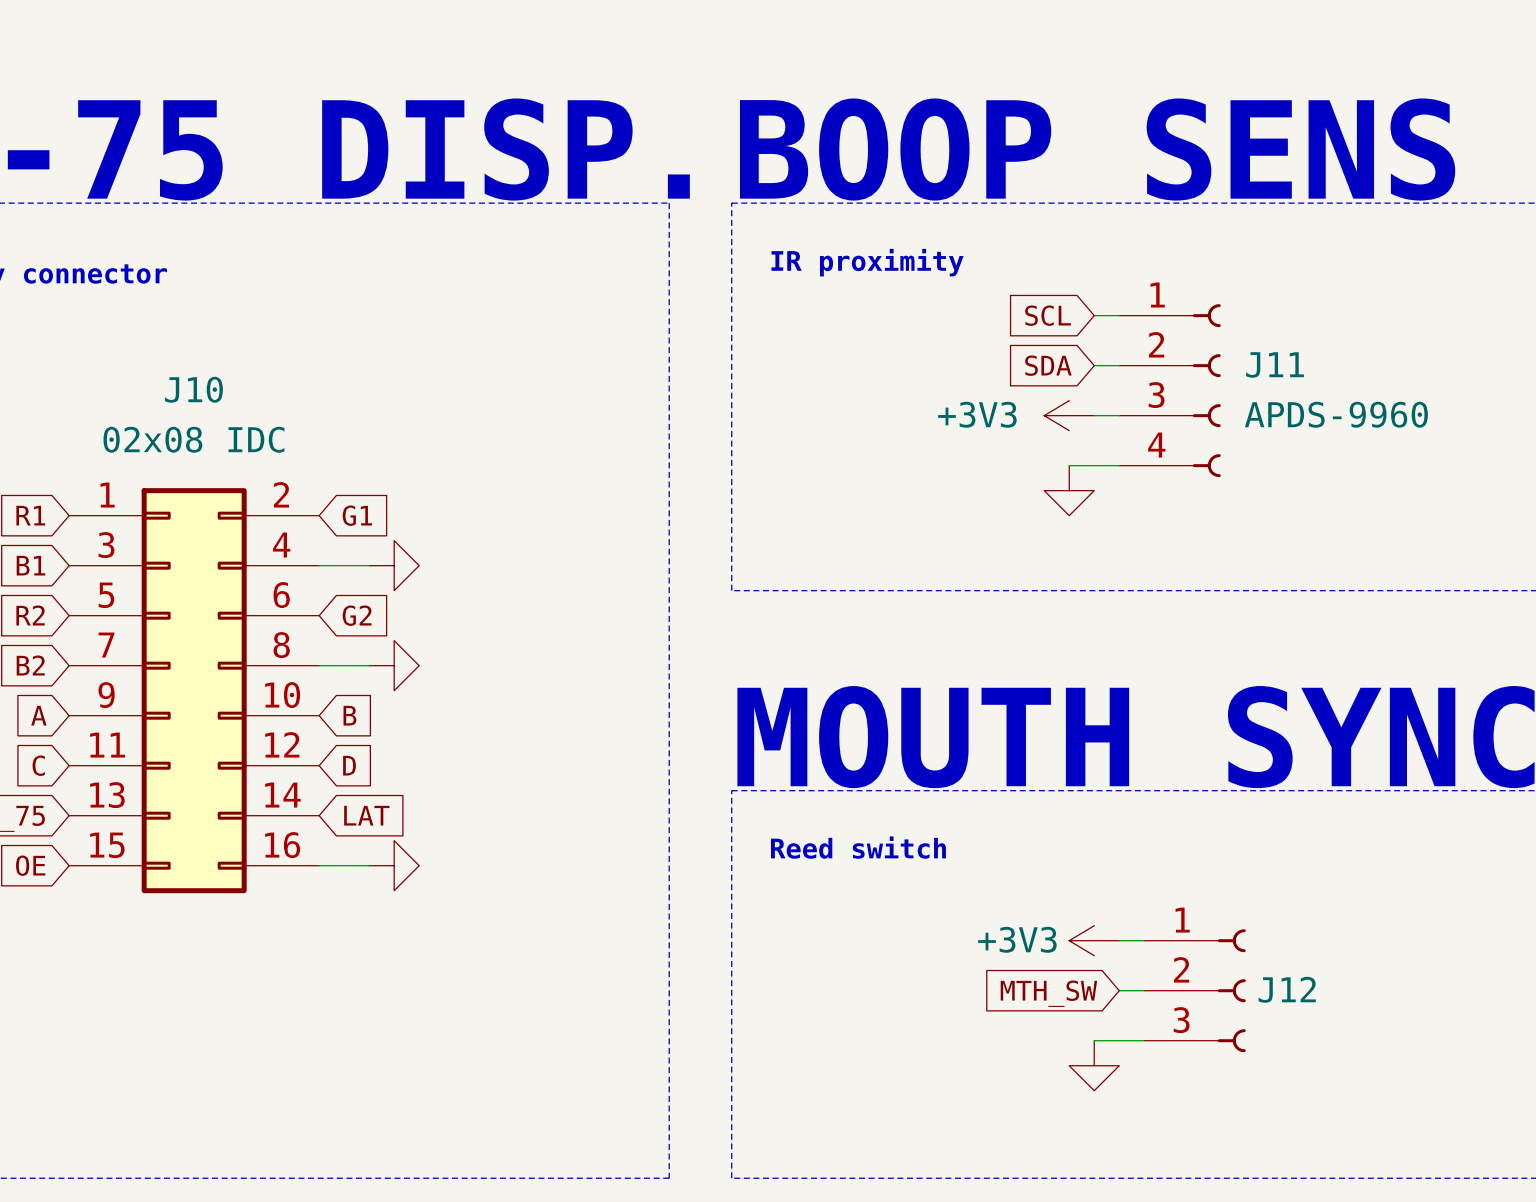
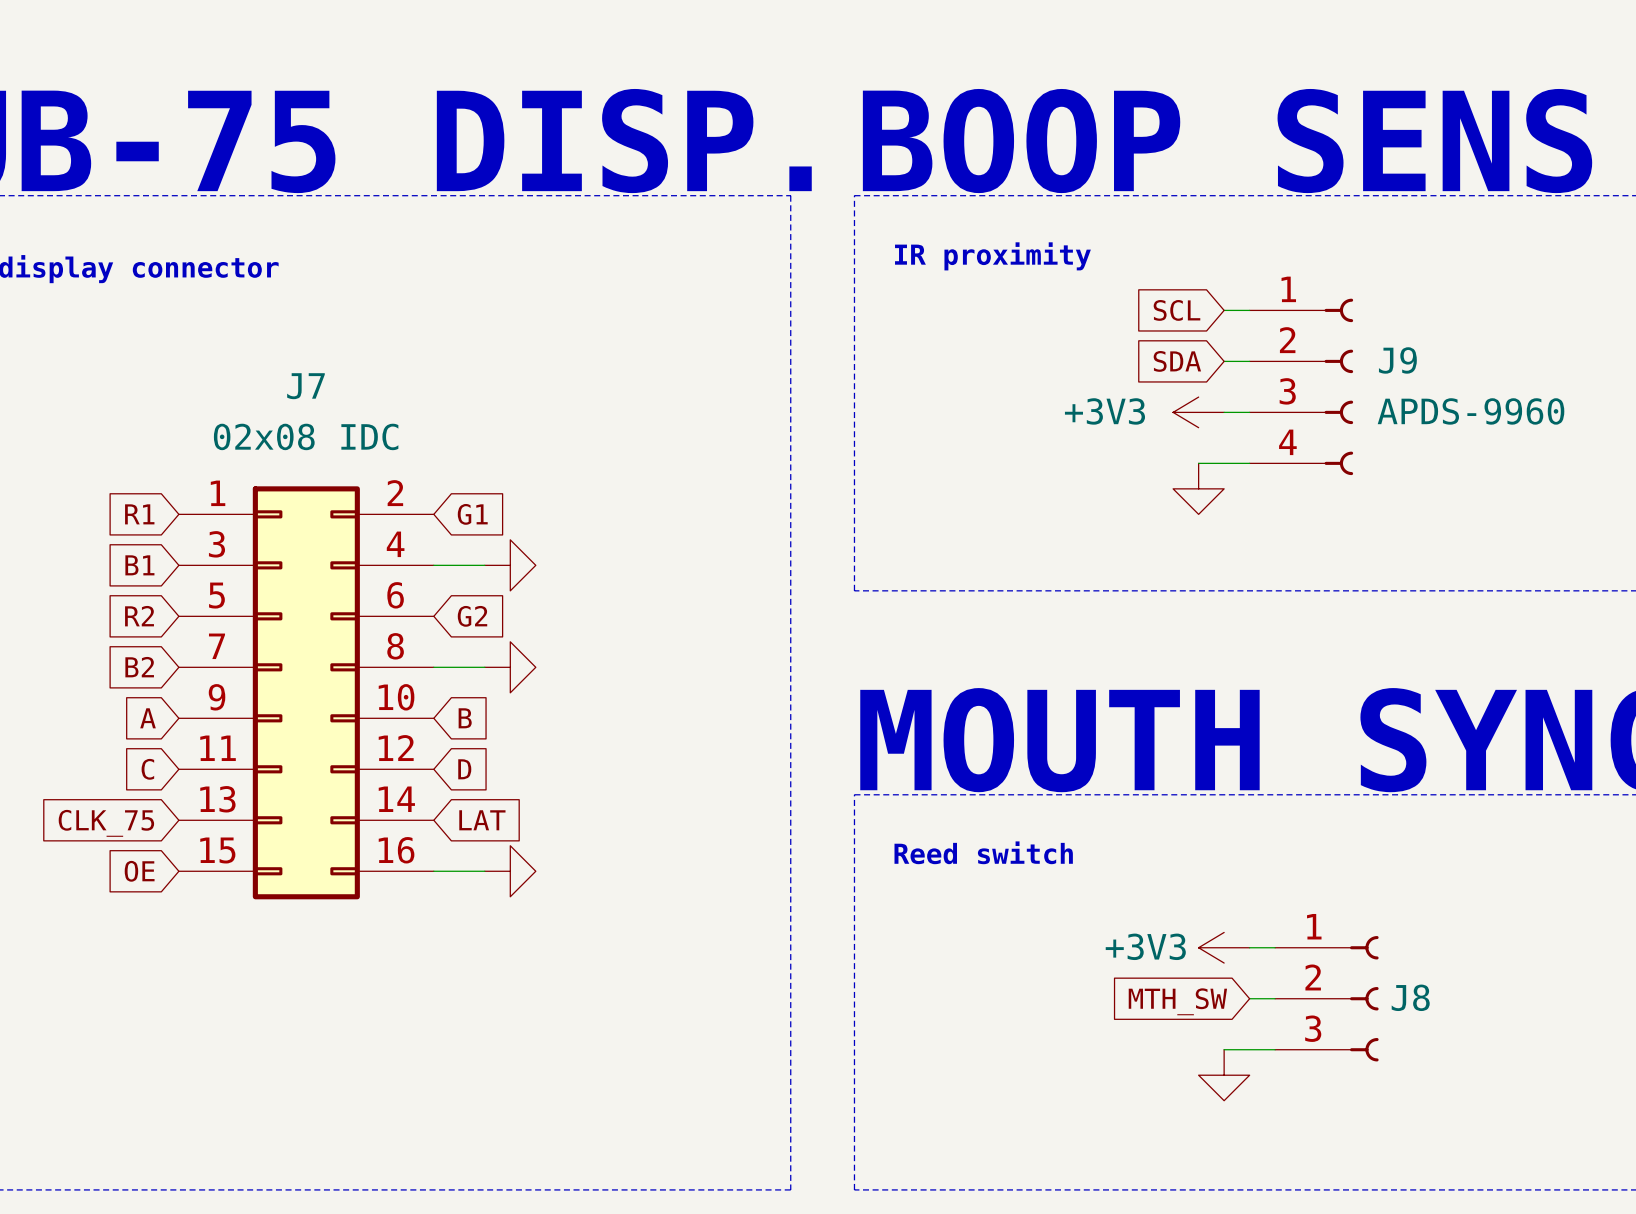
J11 name: J11 (1275, 364) -> J9 (1397, 360)
J10 name: J10 (193, 389) -> J7 (305, 386)
J12 name: J12 (1287, 989) -> J8 (1410, 997)

